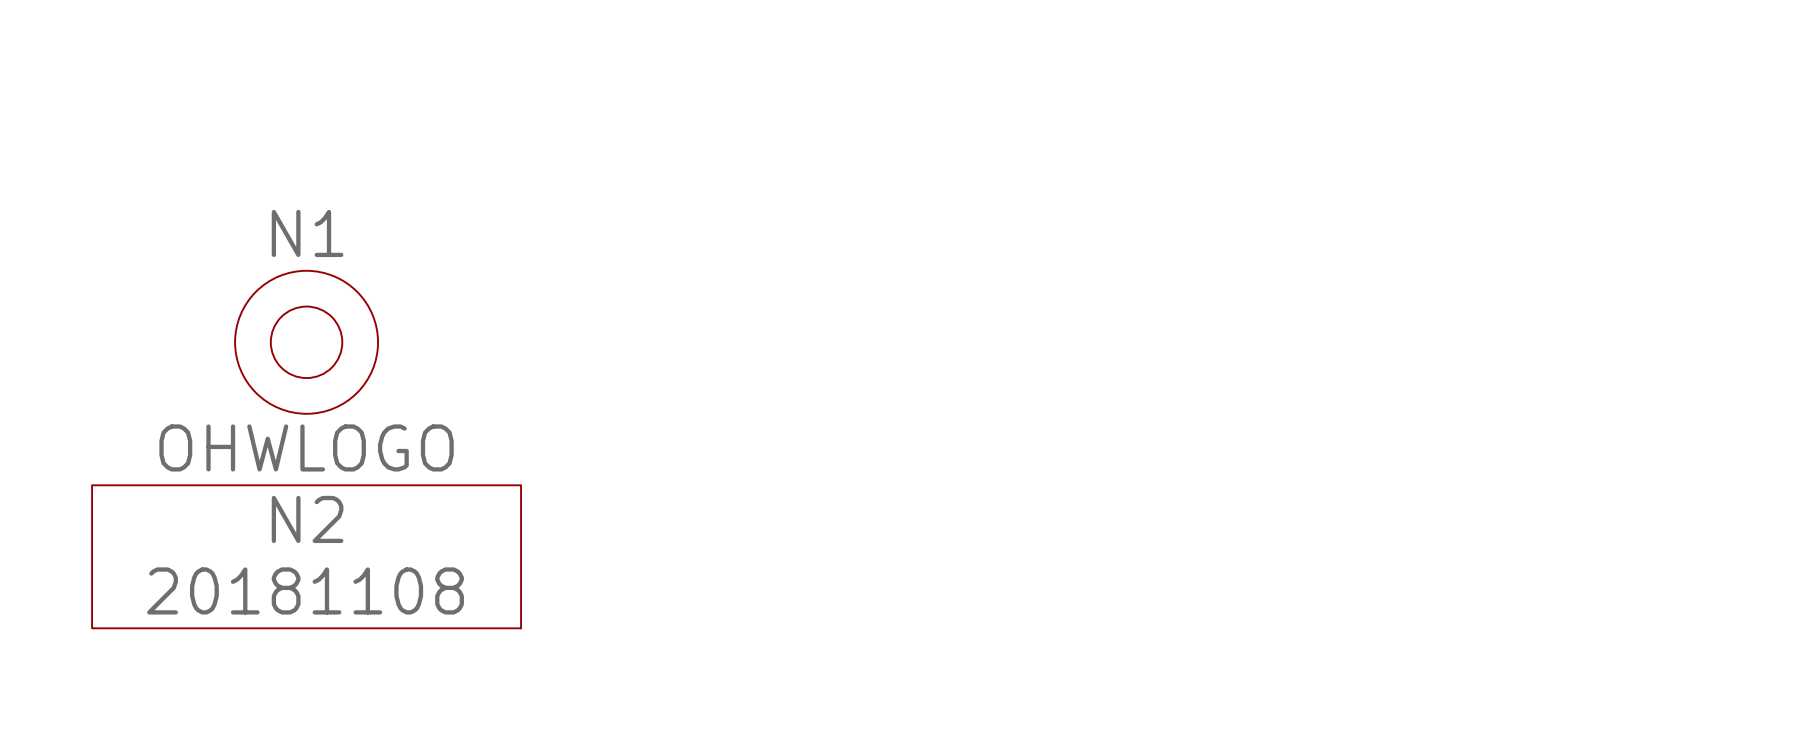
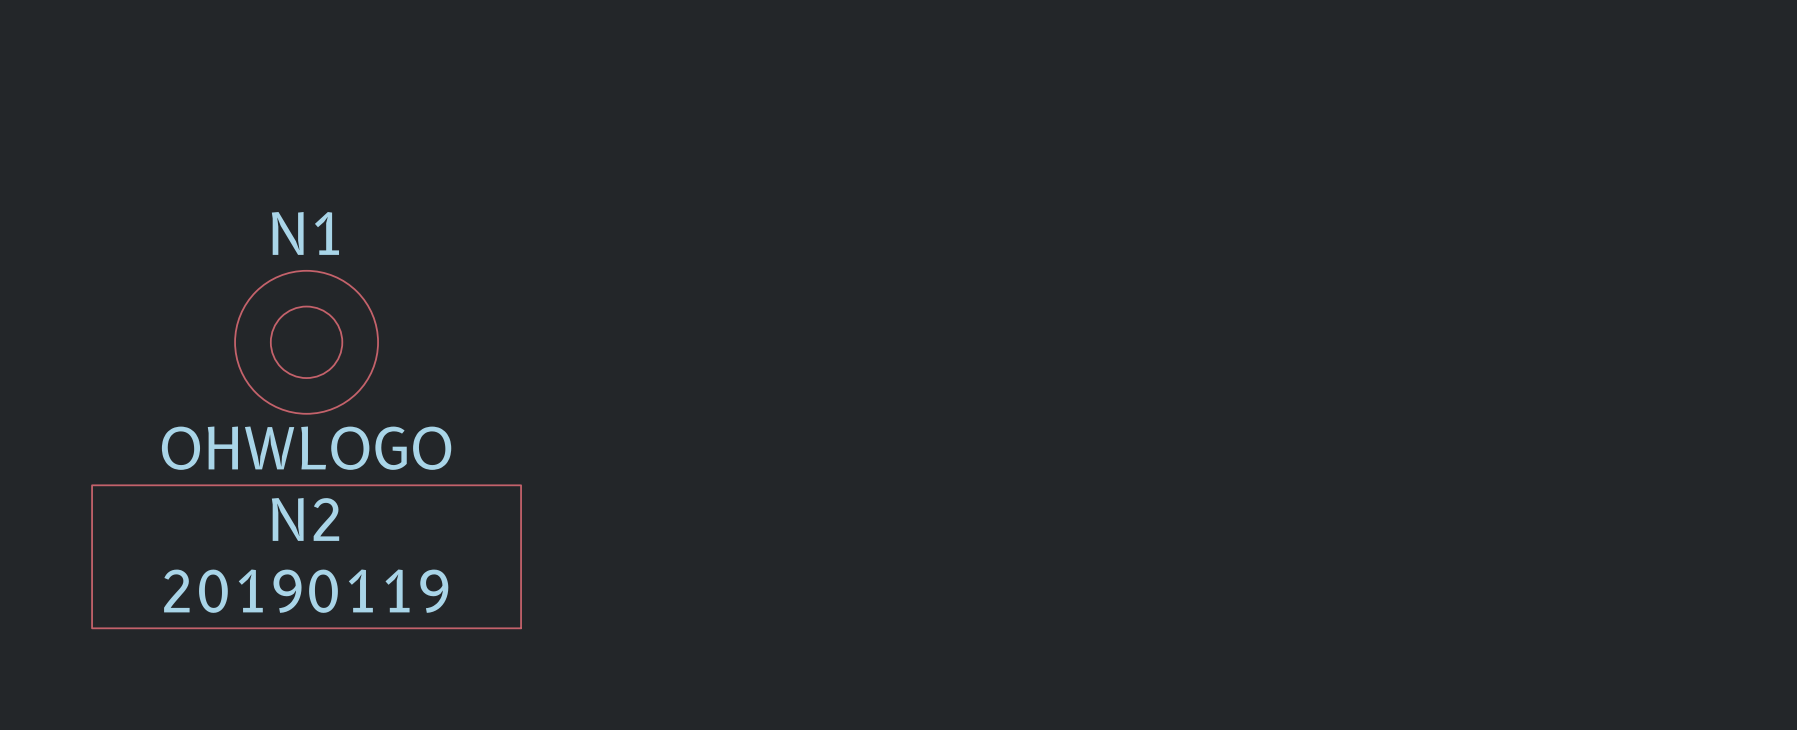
N2 value: 20181108 (305, 590) -> 20190119 (306, 591)

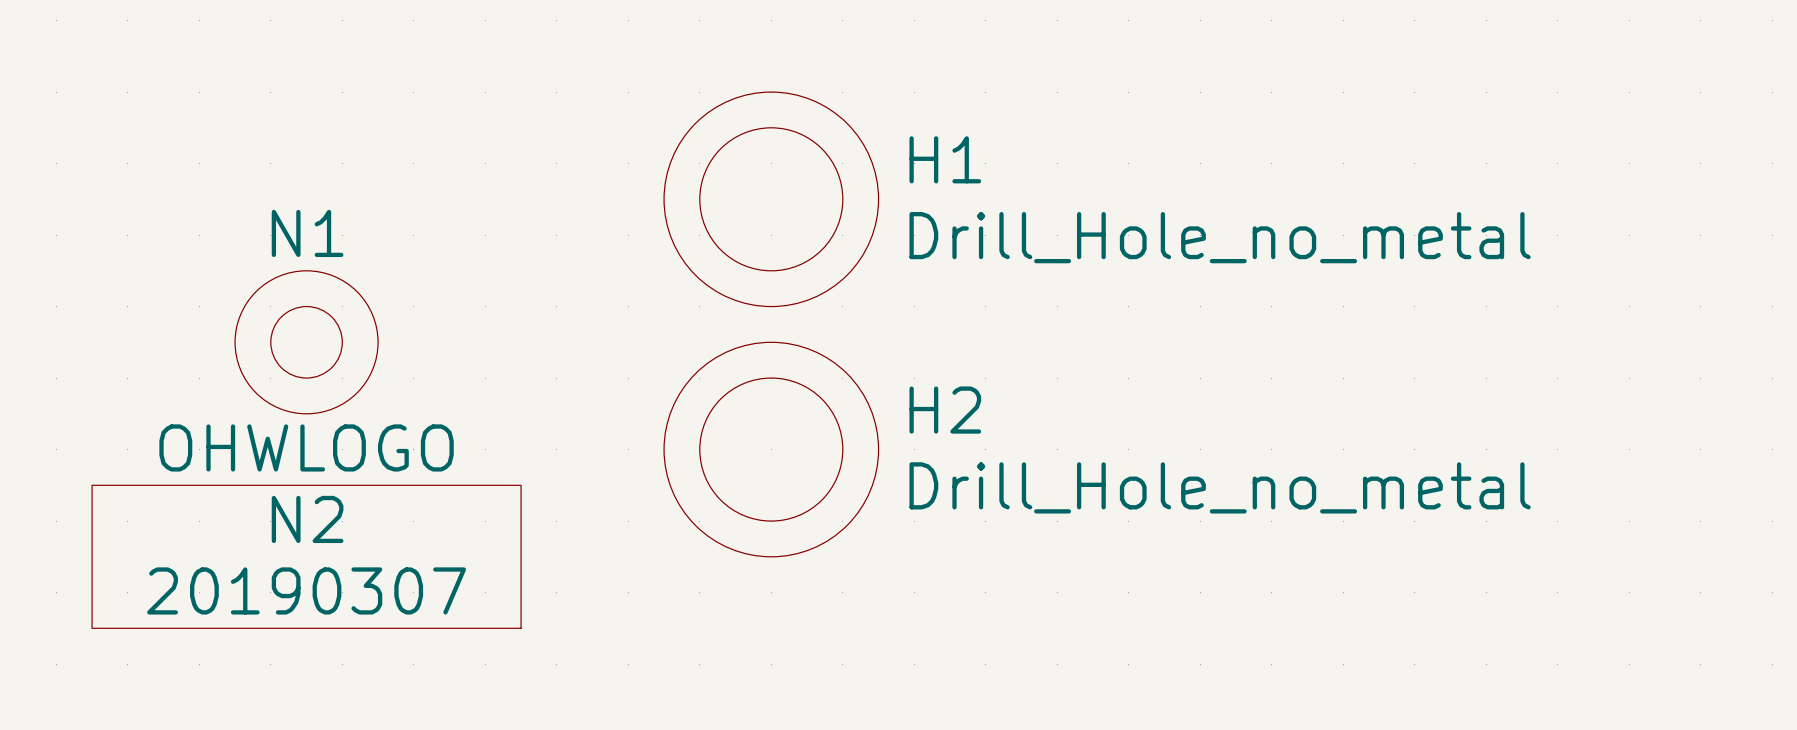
H1: none -> Drill_Hole_no_metal (771, 199)
H2: none -> Drill_Hole_no_metal (771, 449)
N2 value: 20190119 (306, 591) -> 20190307 (306, 590)

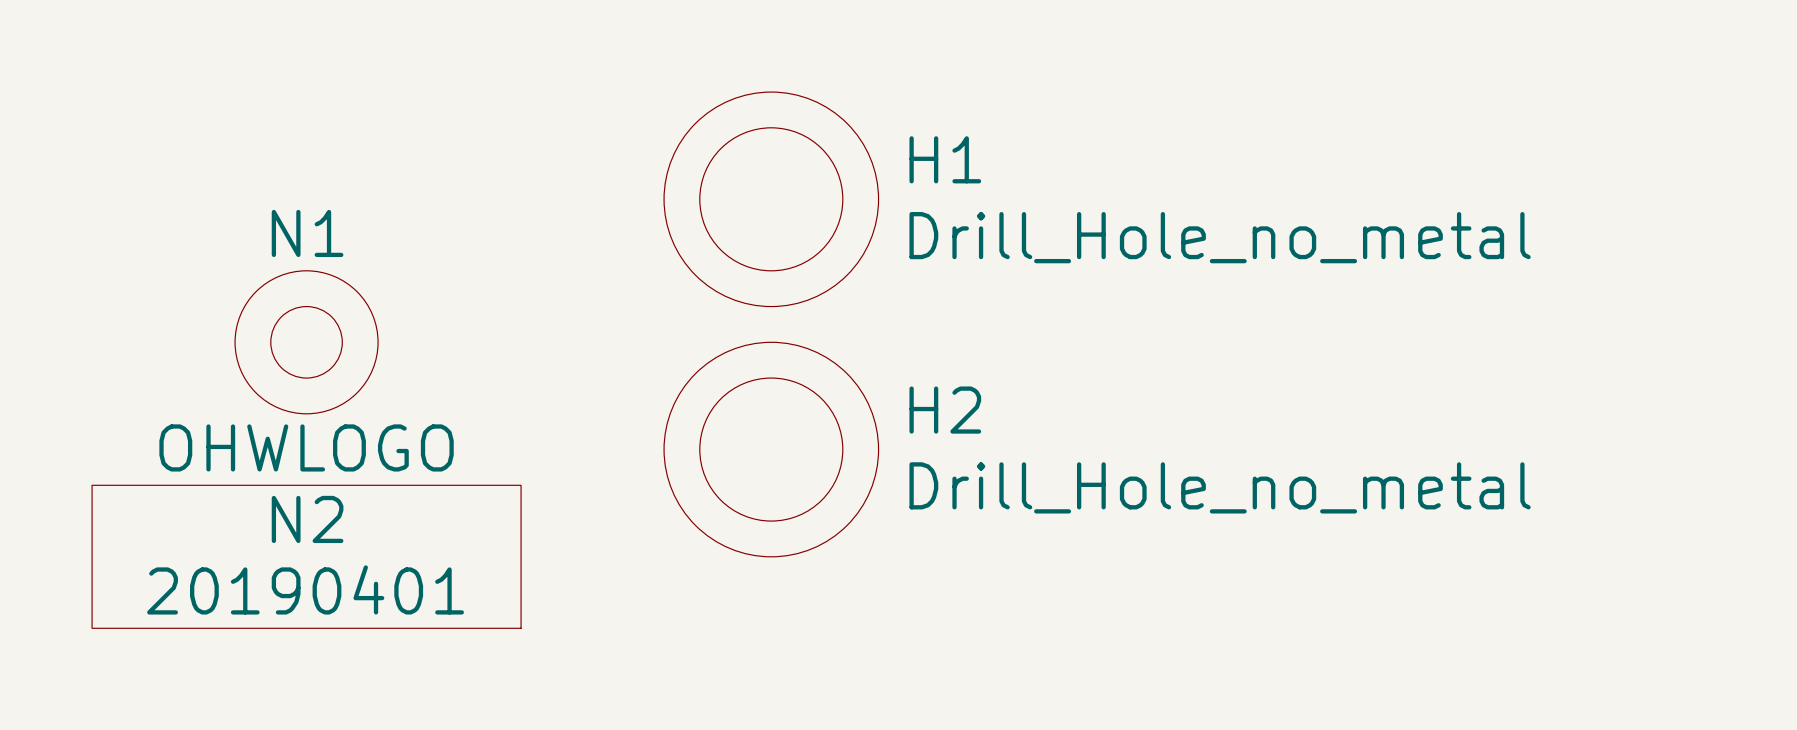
N2 value: 20190307 (306, 590) -> 20190401 (305, 589)

